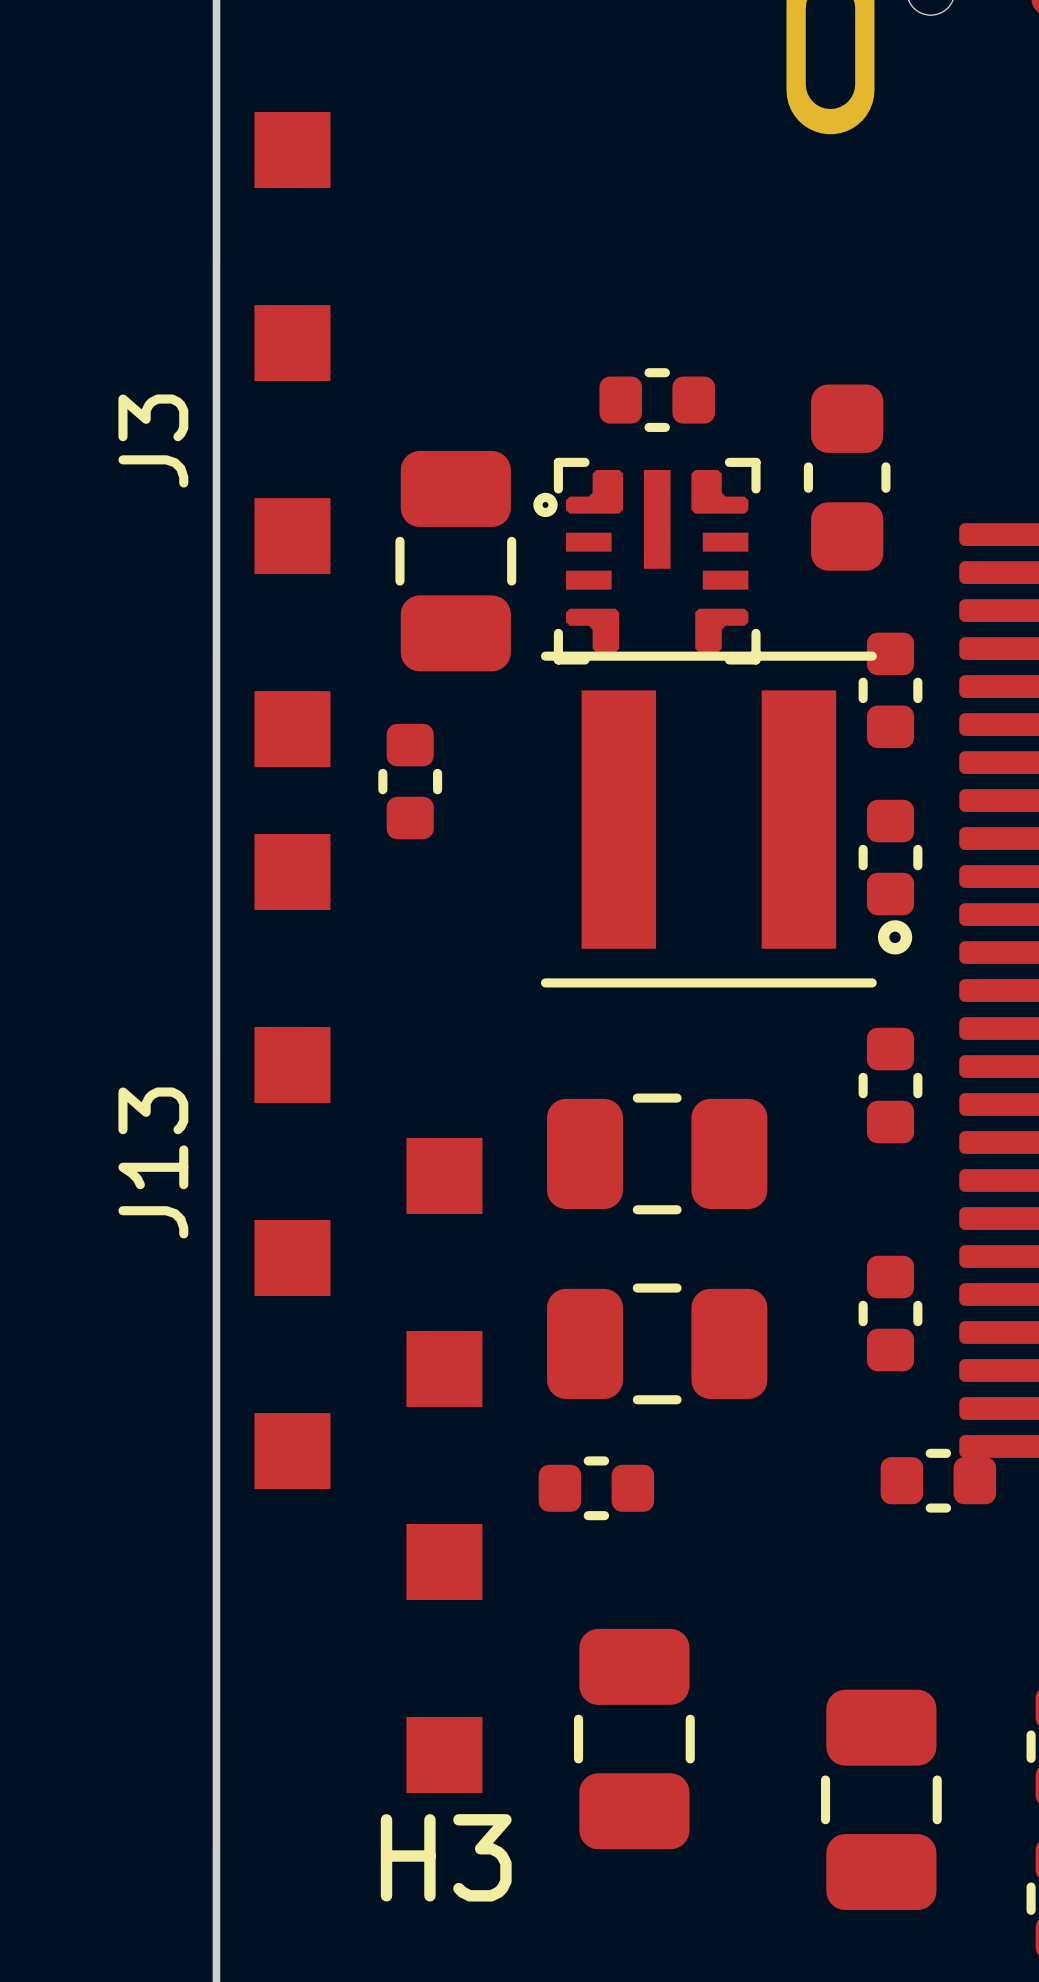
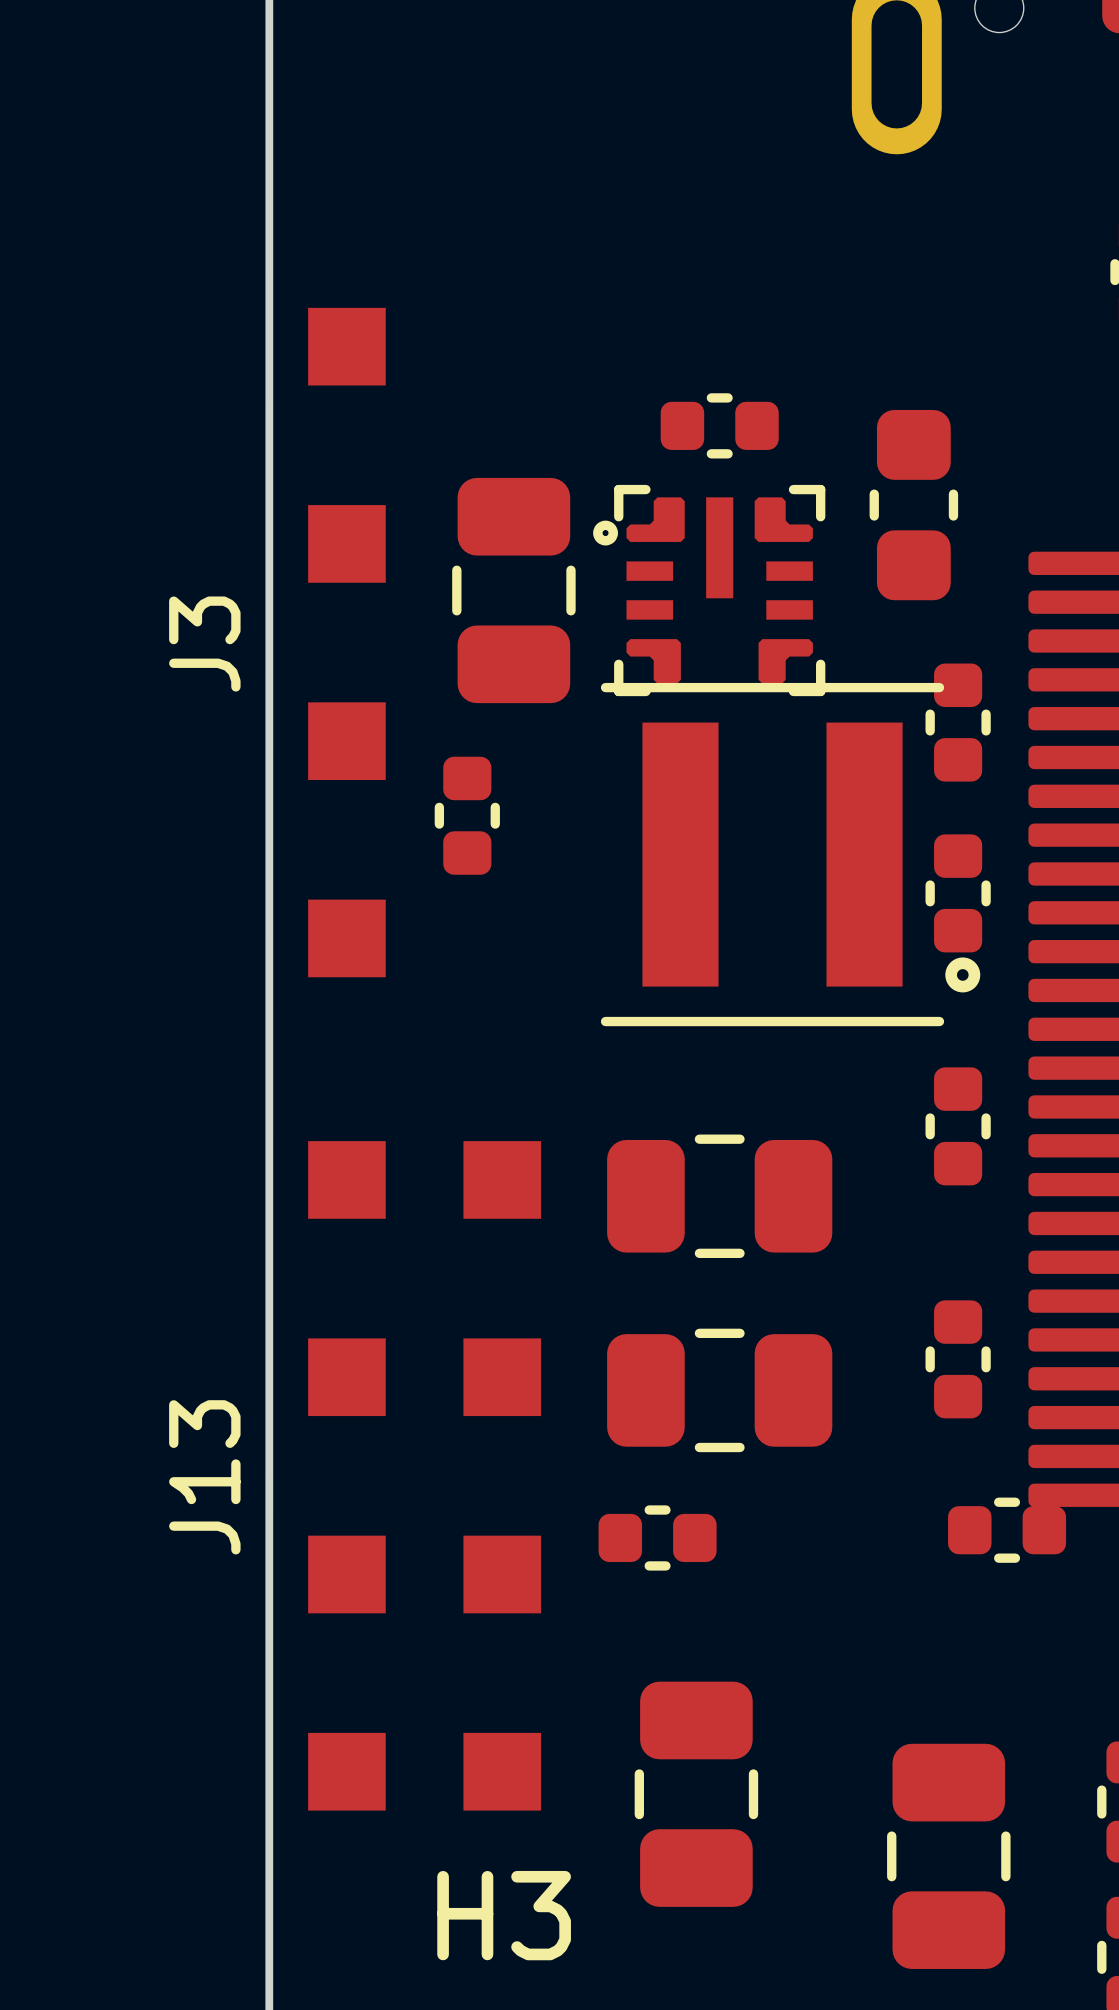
J3 position: (292, 439) -> (346, 642)
J13 position: (292, 1161) -> (346, 1475)
part position: (444, 1465) -> (502, 1475)

